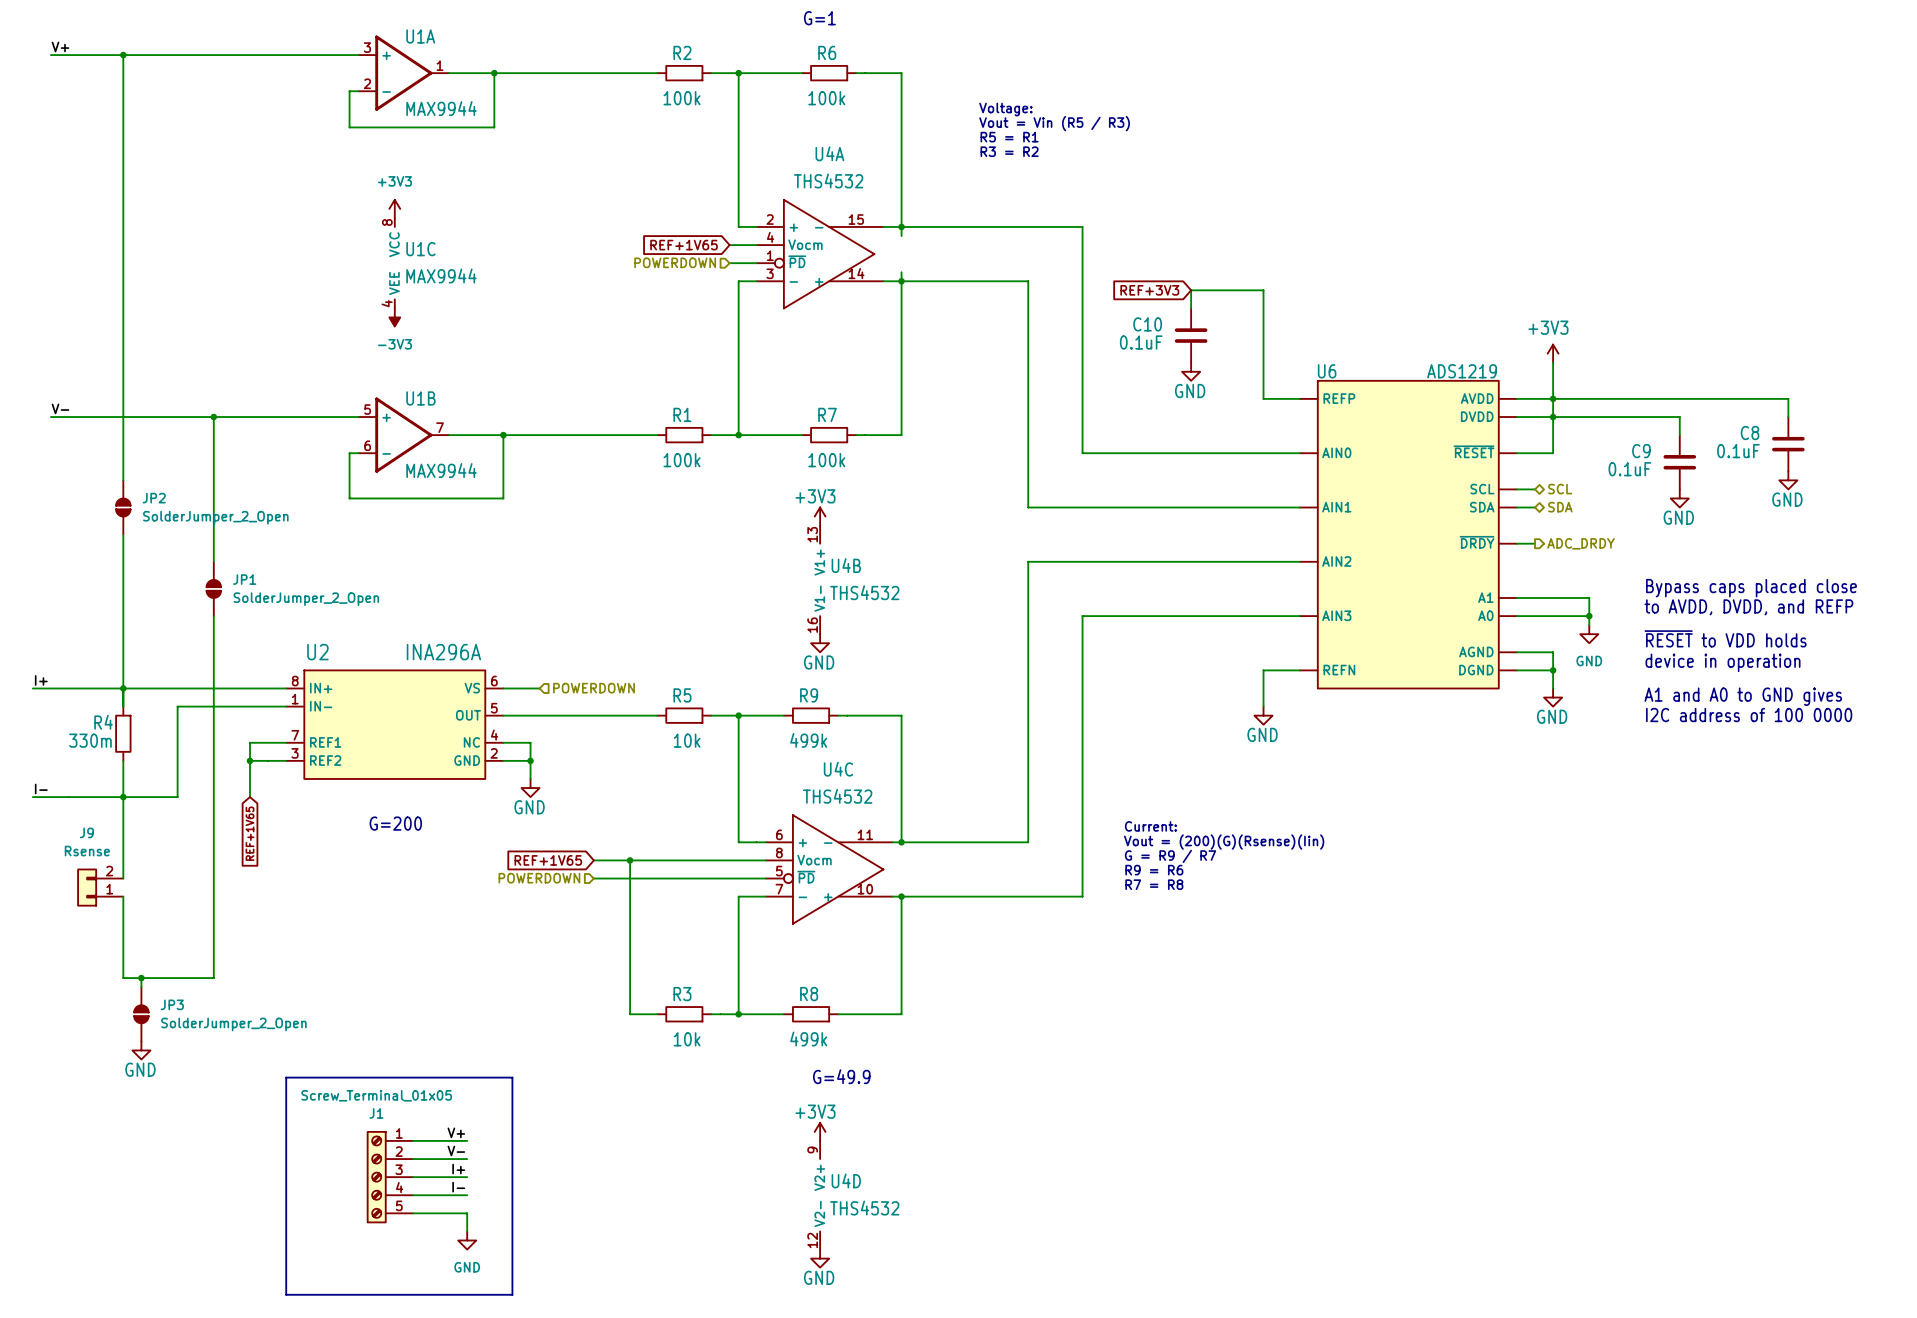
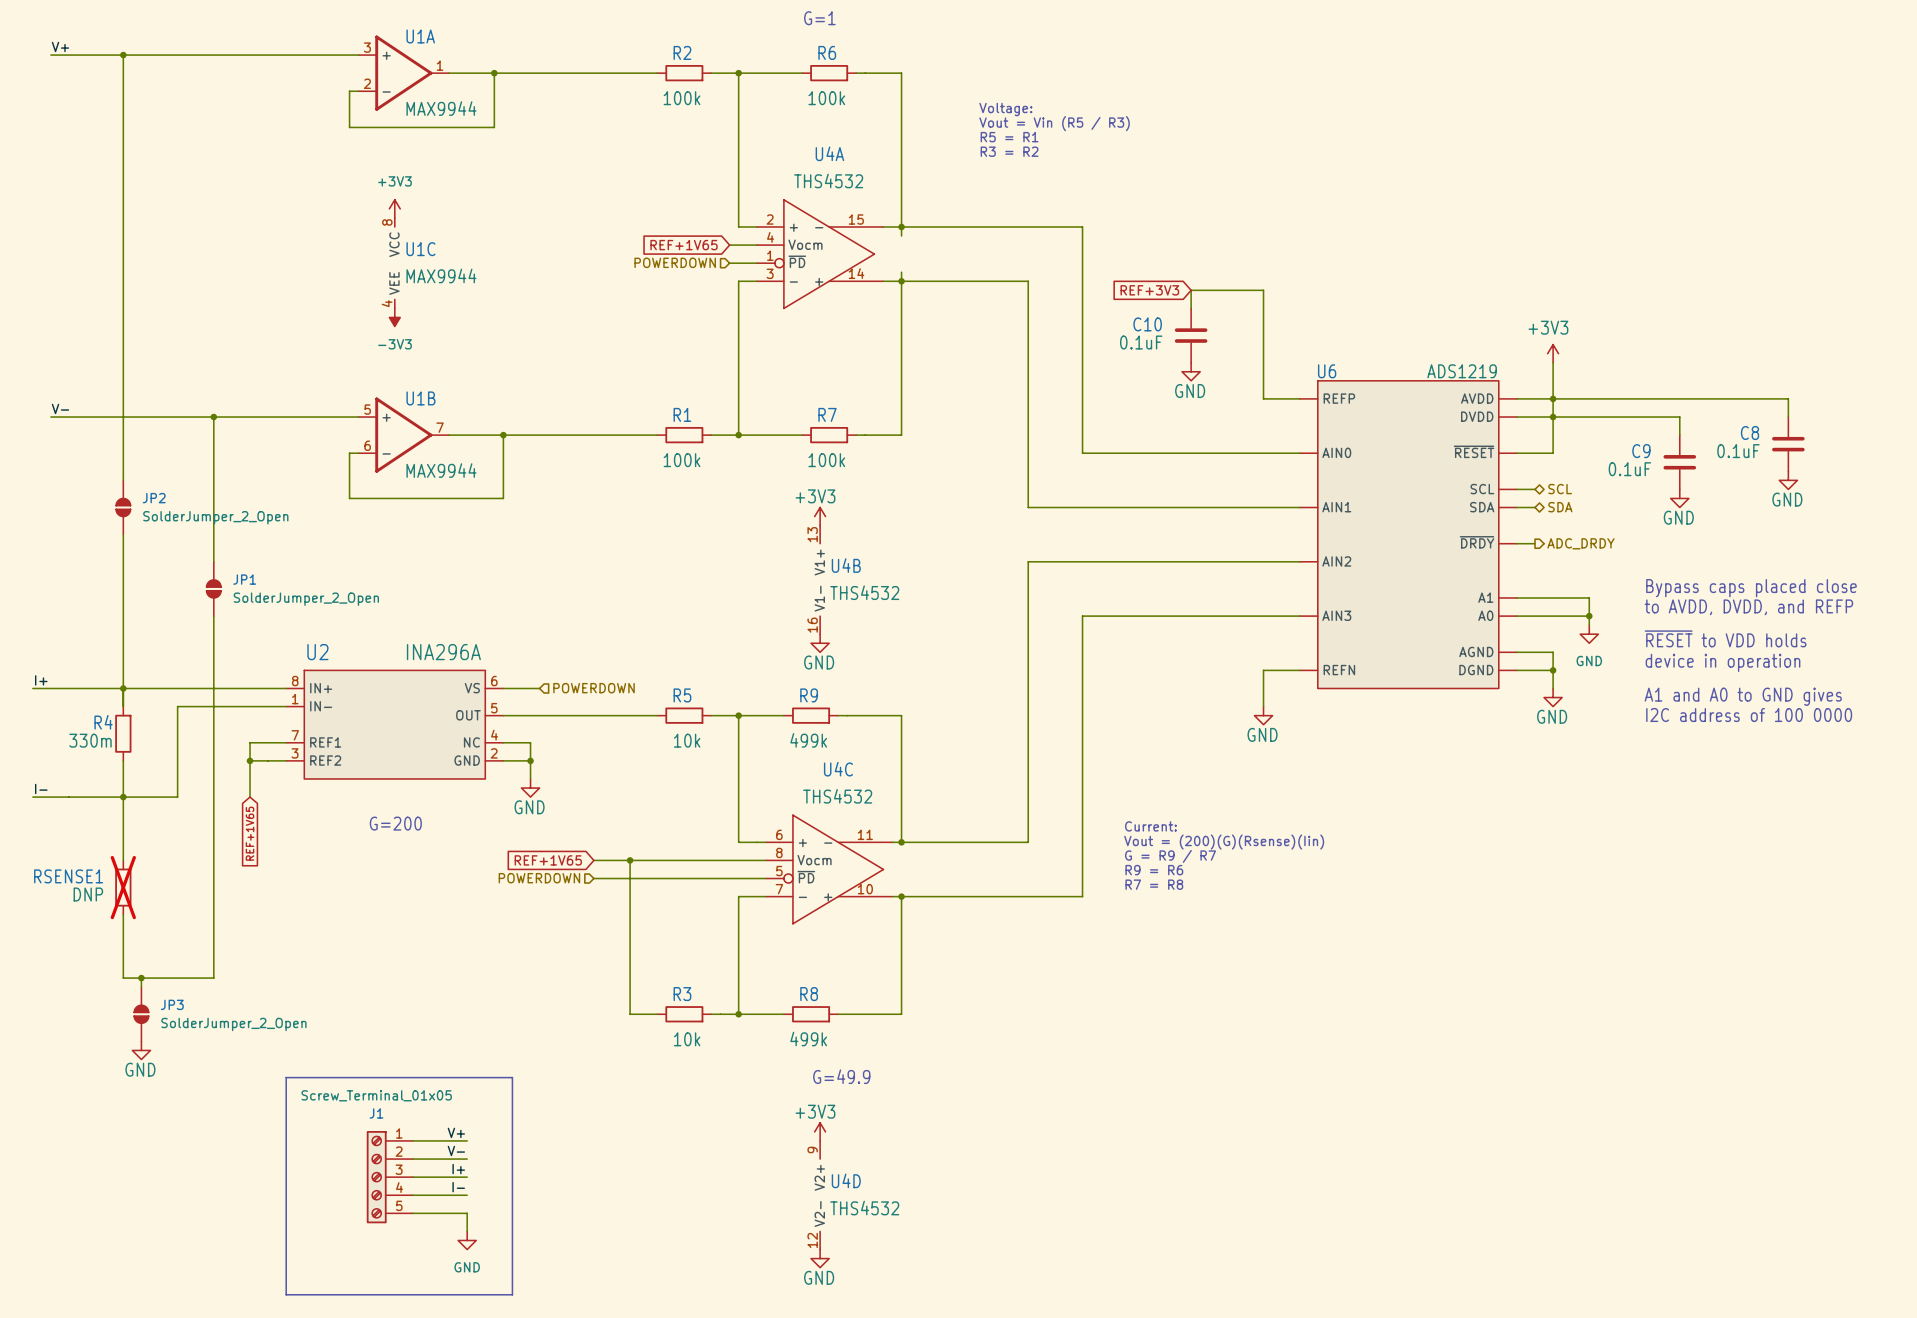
J9: Rsense (100, 887) -> none
RSENSE1: none -> DNP (123, 887)

